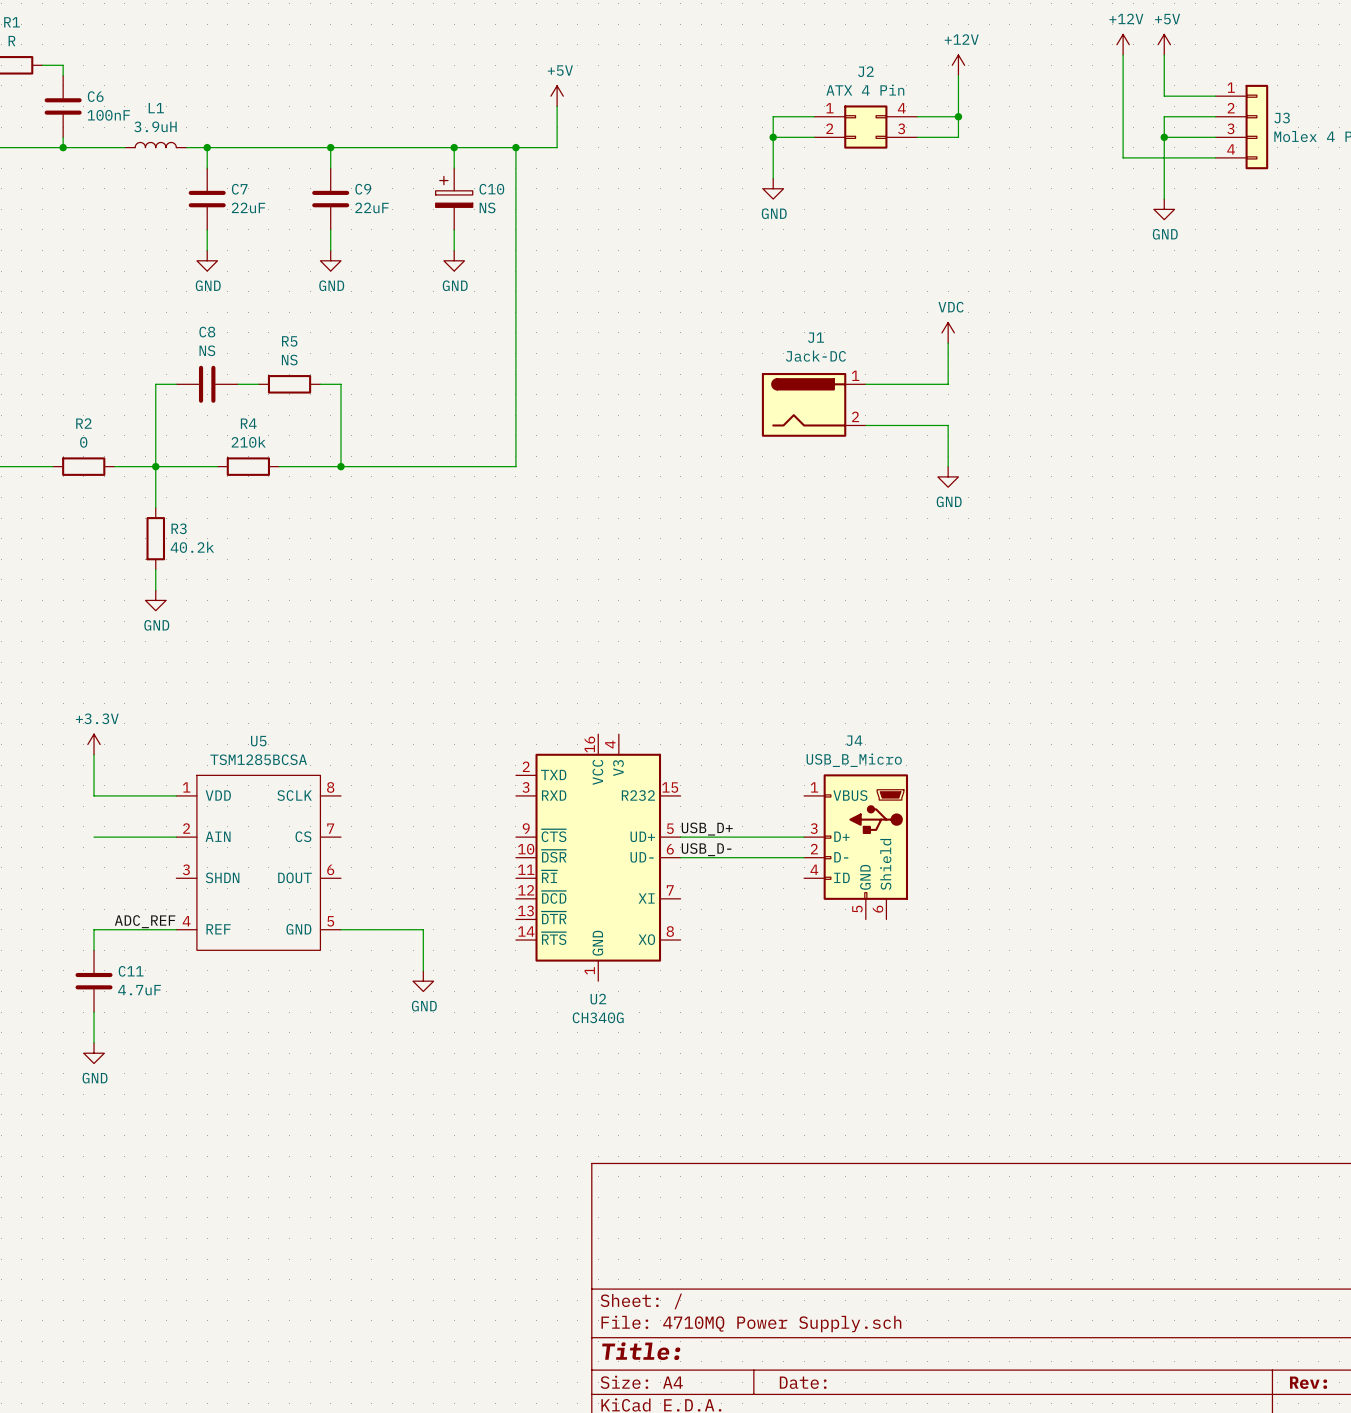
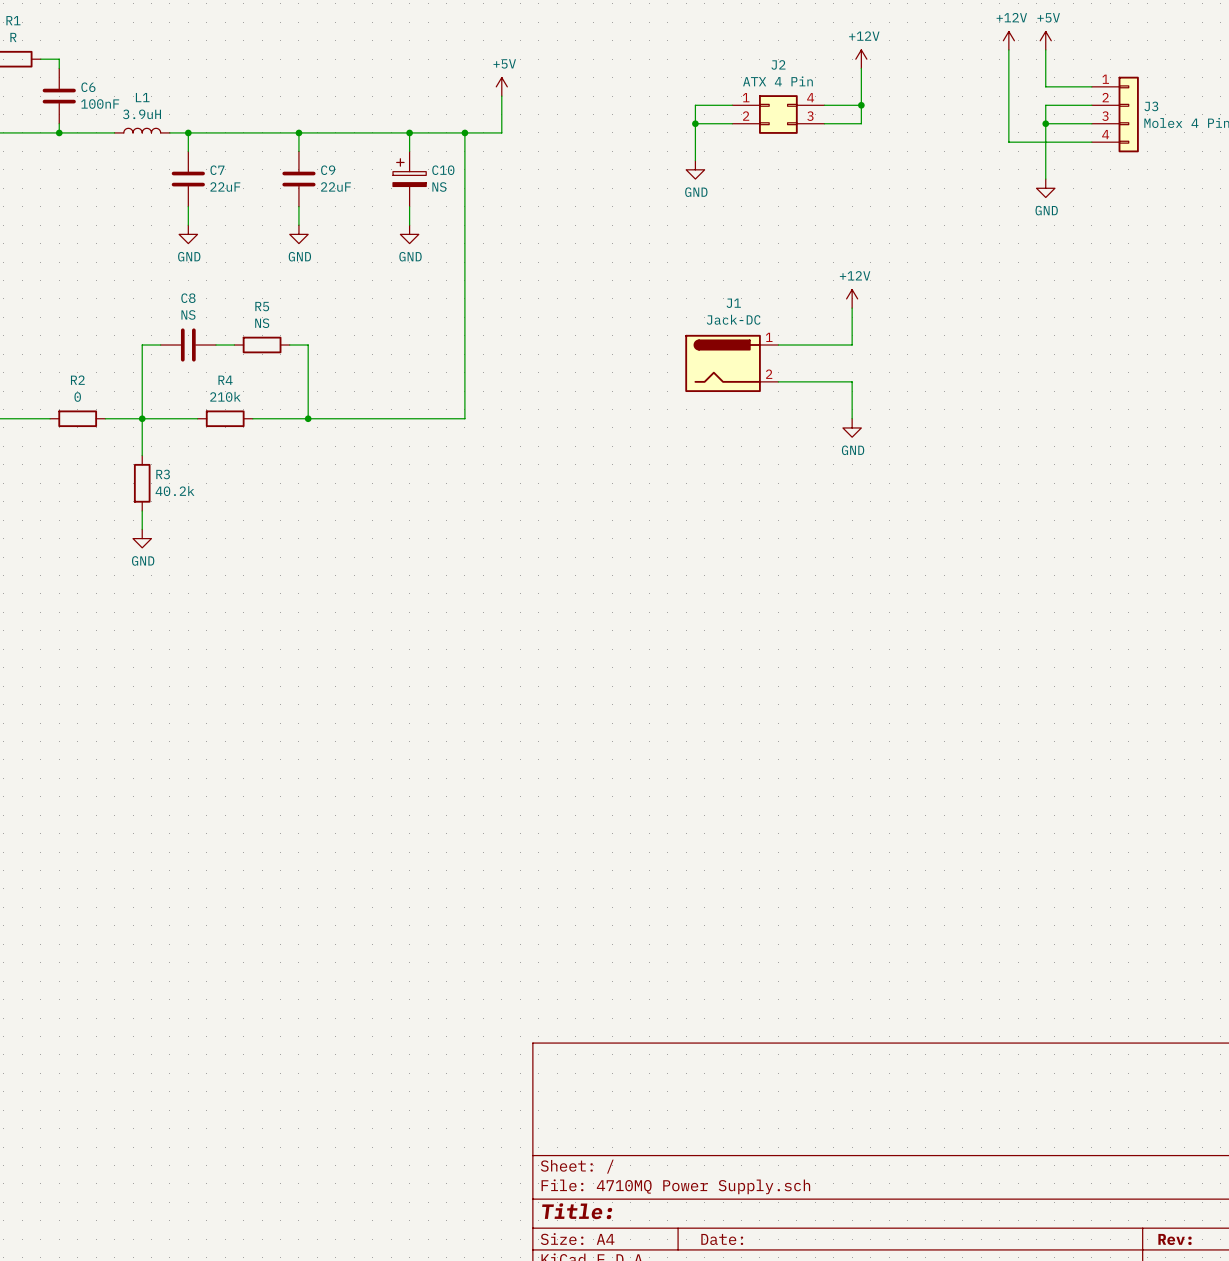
power symbol: VDC (948, 332) -> +12V (852, 298)
power symbol: +3.3V (94, 744) -> none
wire: (94, 754) (94, 795) (176, 795) -> none
label: USB_D+ (707, 829) -> none
wire: (94, 837) (176, 837) -> none
wire: (680, 837) (804, 837) -> none
J4: USB_B_Micro (856, 846) -> none
label: USB_D- (706, 849) -> none
U2: CH340G (598, 857) -> none
wire: (680, 857) (804, 857) -> none
U5: TSM1285BCSA (258, 862) -> none
label: ADC_REF (145, 921) -> none
wire: (176, 929) (94, 929) (94, 950) -> none
wire: (340, 929) (423, 929) (423, 970) -> none
C11: 4.7uF (94, 981) -> none
power symbol: GND (423, 981) -> none
wire: (94, 1012) (94, 1042) -> none
power symbol: GND (94, 1053) -> none

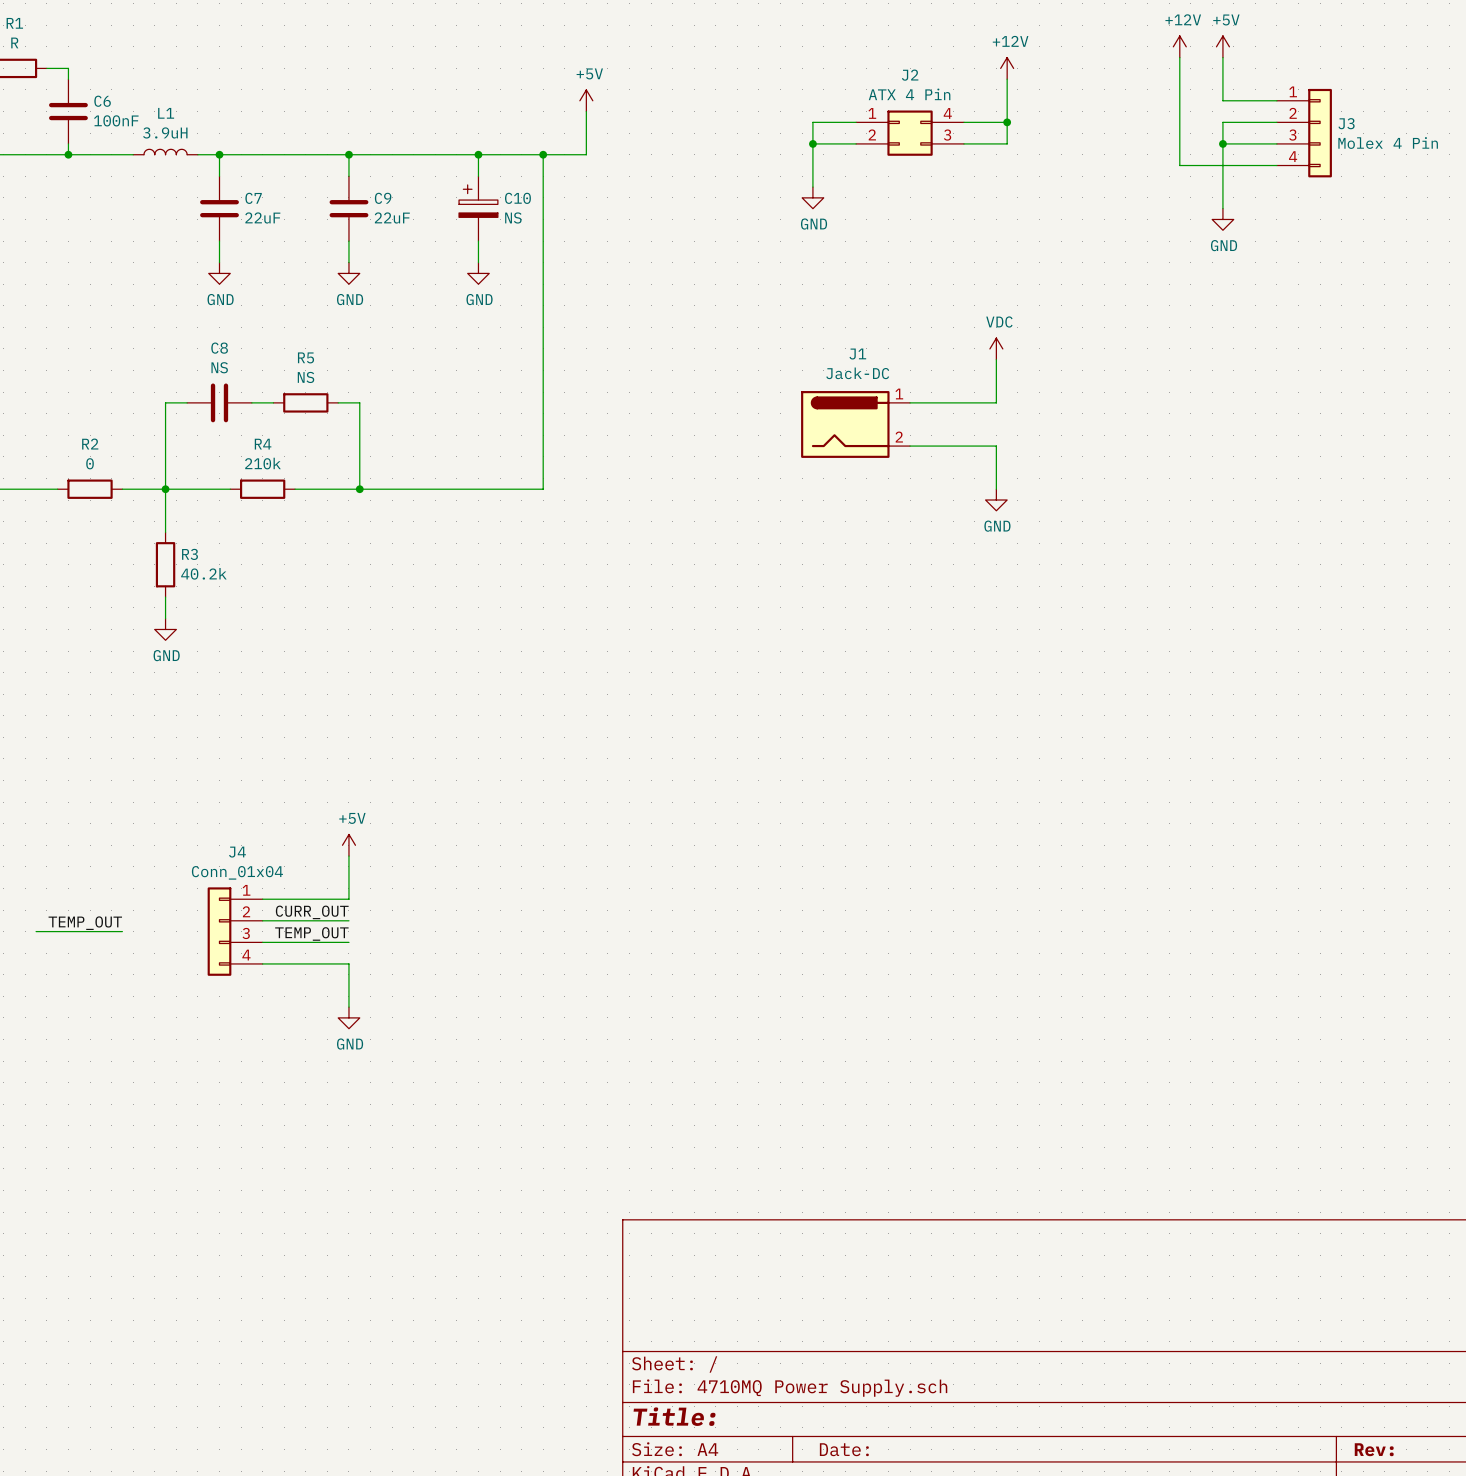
power symbol: +12V (852, 298) -> VDC (996, 348)
power symbol: none -> +5V (348, 845)
wire: none -> (348, 856) (348, 899) (262, 899)
label: none -> CURR_OUT (312, 912)
wire: none -> (262, 920) (348, 920)
label: none -> TEMP_OUT (85, 923)
wire: none -> (36, 931) (122, 931)
J4: none -> Conn_01x04 (235, 931)
label: none -> TEMP_OUT (311, 933)
wire: none -> (262, 942) (348, 942)
wire: none -> (262, 963) (348, 963) (348, 1007)
power symbol: none -> GND (348, 1017)

